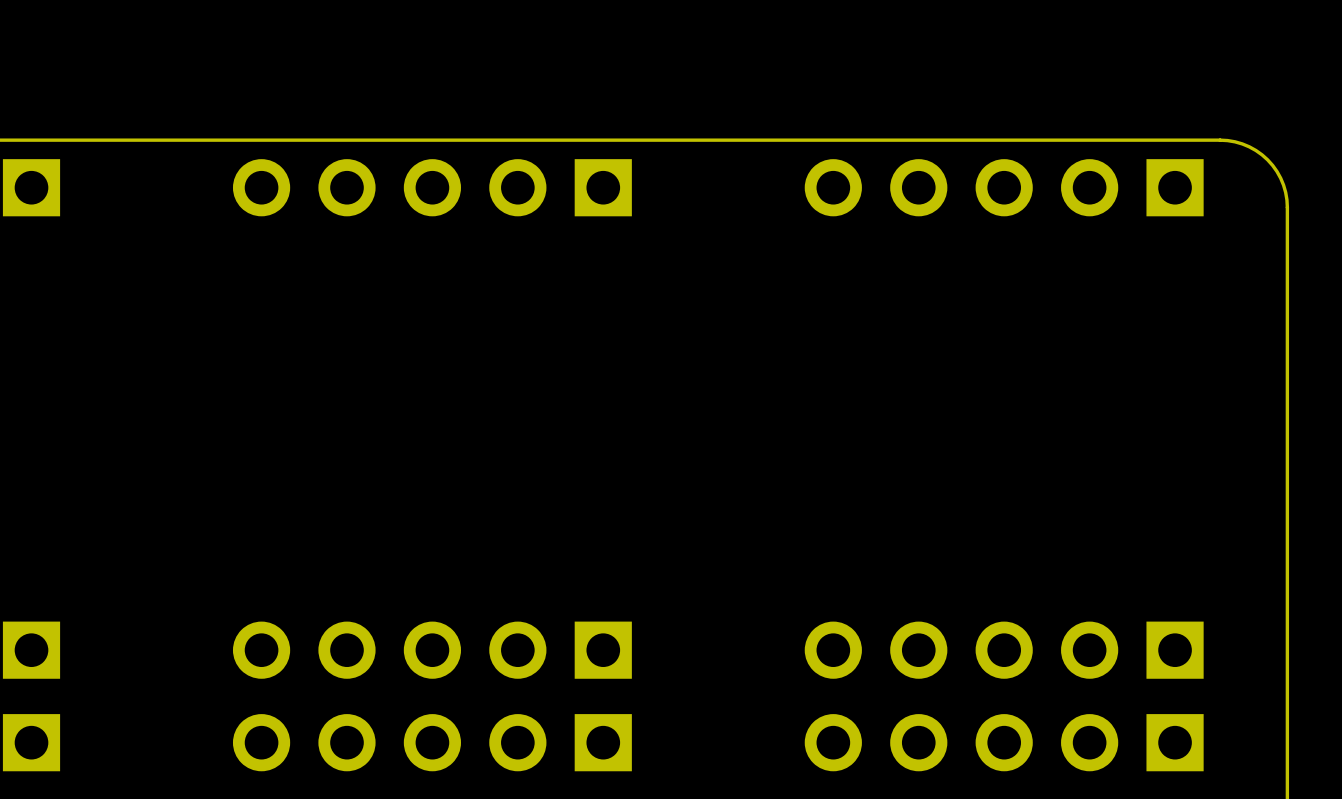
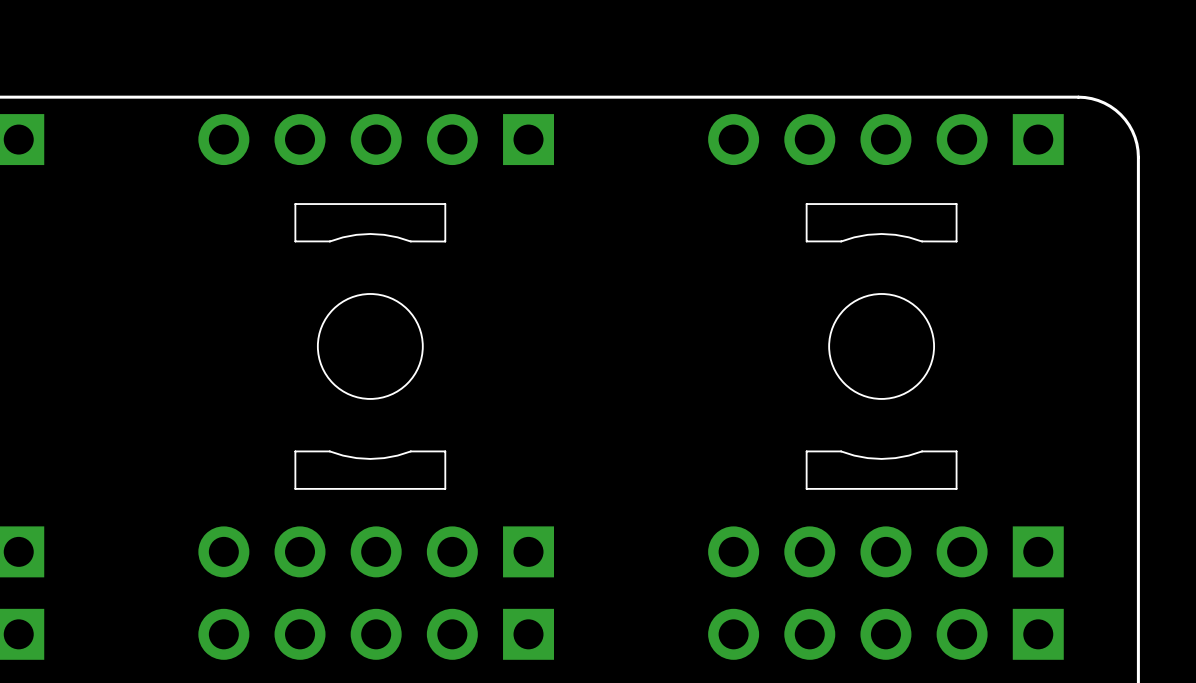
board edge: none -> (445, 204) (295, 204) (295, 241) (329, 241) (356, 234) (370, 233) (384, 234) (410, 241) (445, 241) (445, 204)
board edge: none -> (956, 204) (806, 204) (806, 241) (841, 241) (867, 234) (881, 233) (895, 234) (922, 241) (956, 241) (956, 204)
round board edge: none -> [317, 293, 423, 400]
round board edge: none -> [828, 293, 935, 400]
board edge: none -> (445, 451) (445, 488) (295, 488) (295, 451) (329, 451) (356, 458) (370, 458) (397, 455) (410, 451) (445, 451)
board edge: none -> (956, 451) (922, 451) (895, 458) (881, 458) (854, 455) (841, 451) (806, 451) (806, 488) (956, 488) (956, 451)

